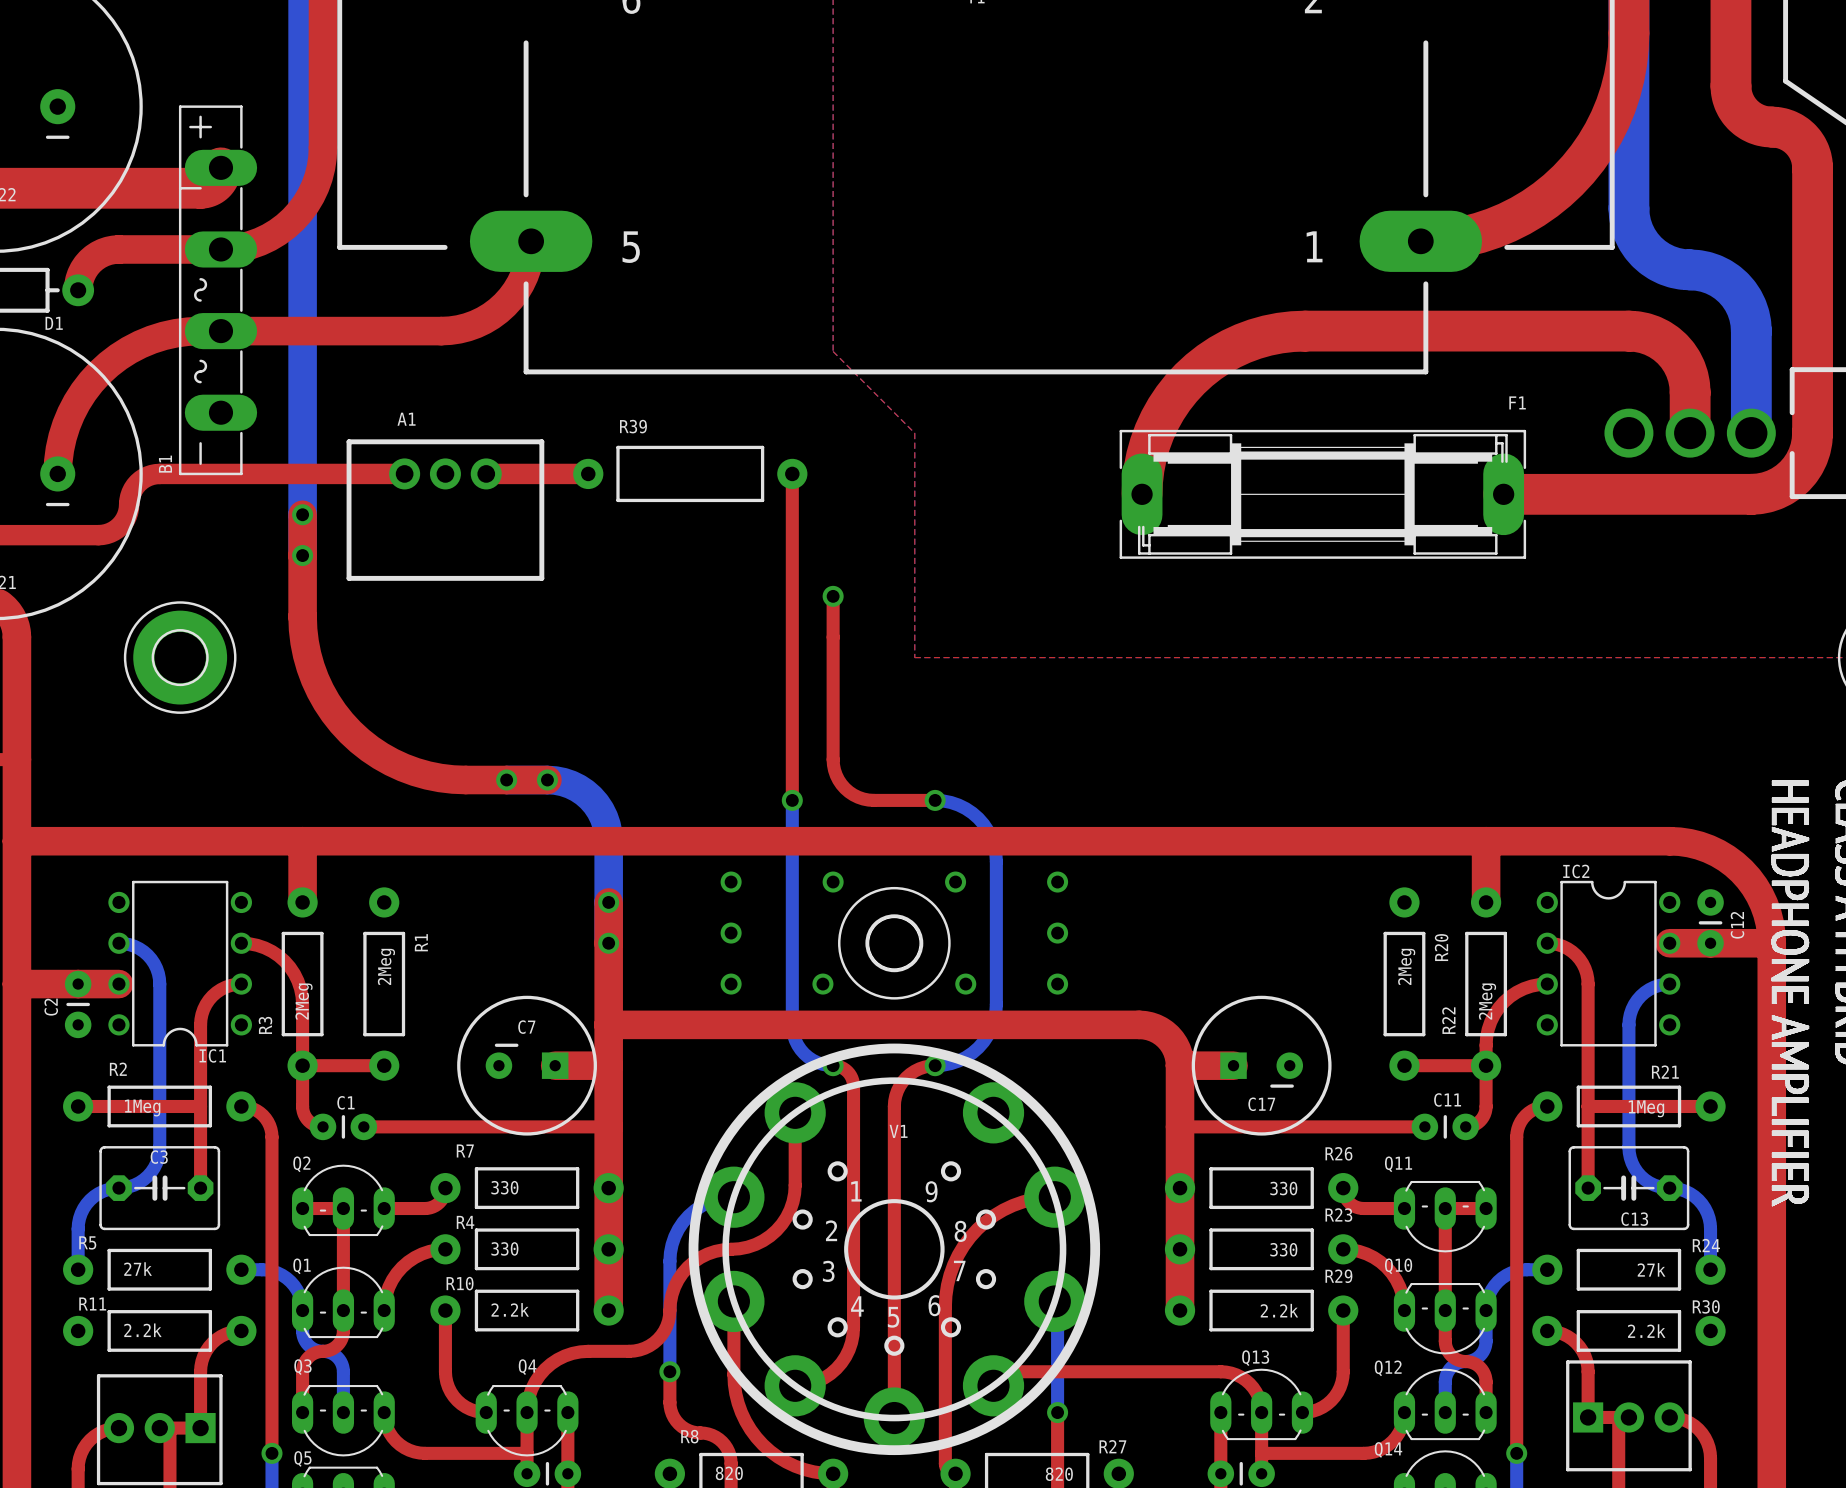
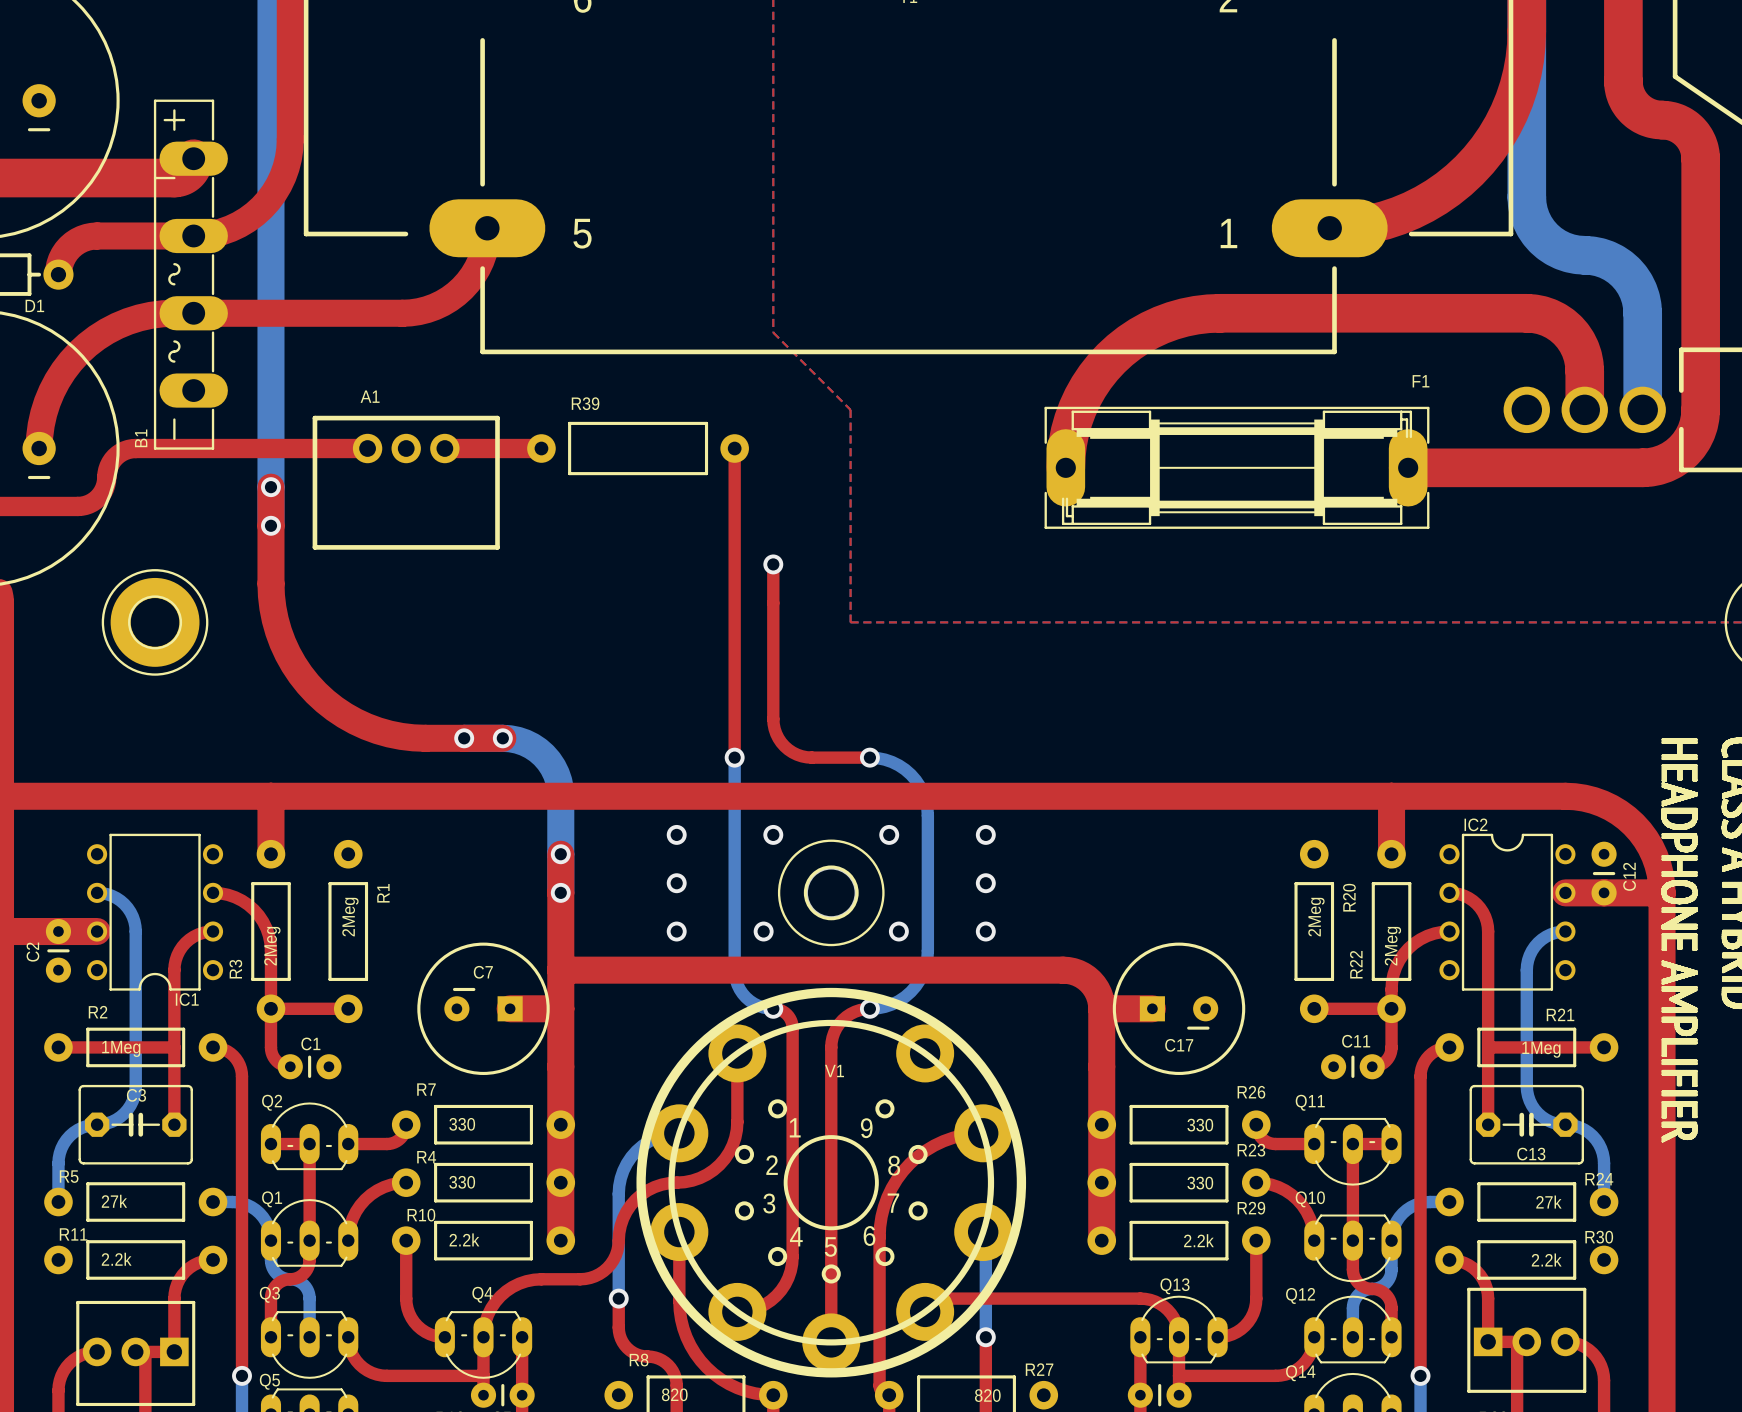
top track: (363, 1126) (608, 1126) -> none
top track: (1180, 1126) (1424, 1126) -> none

